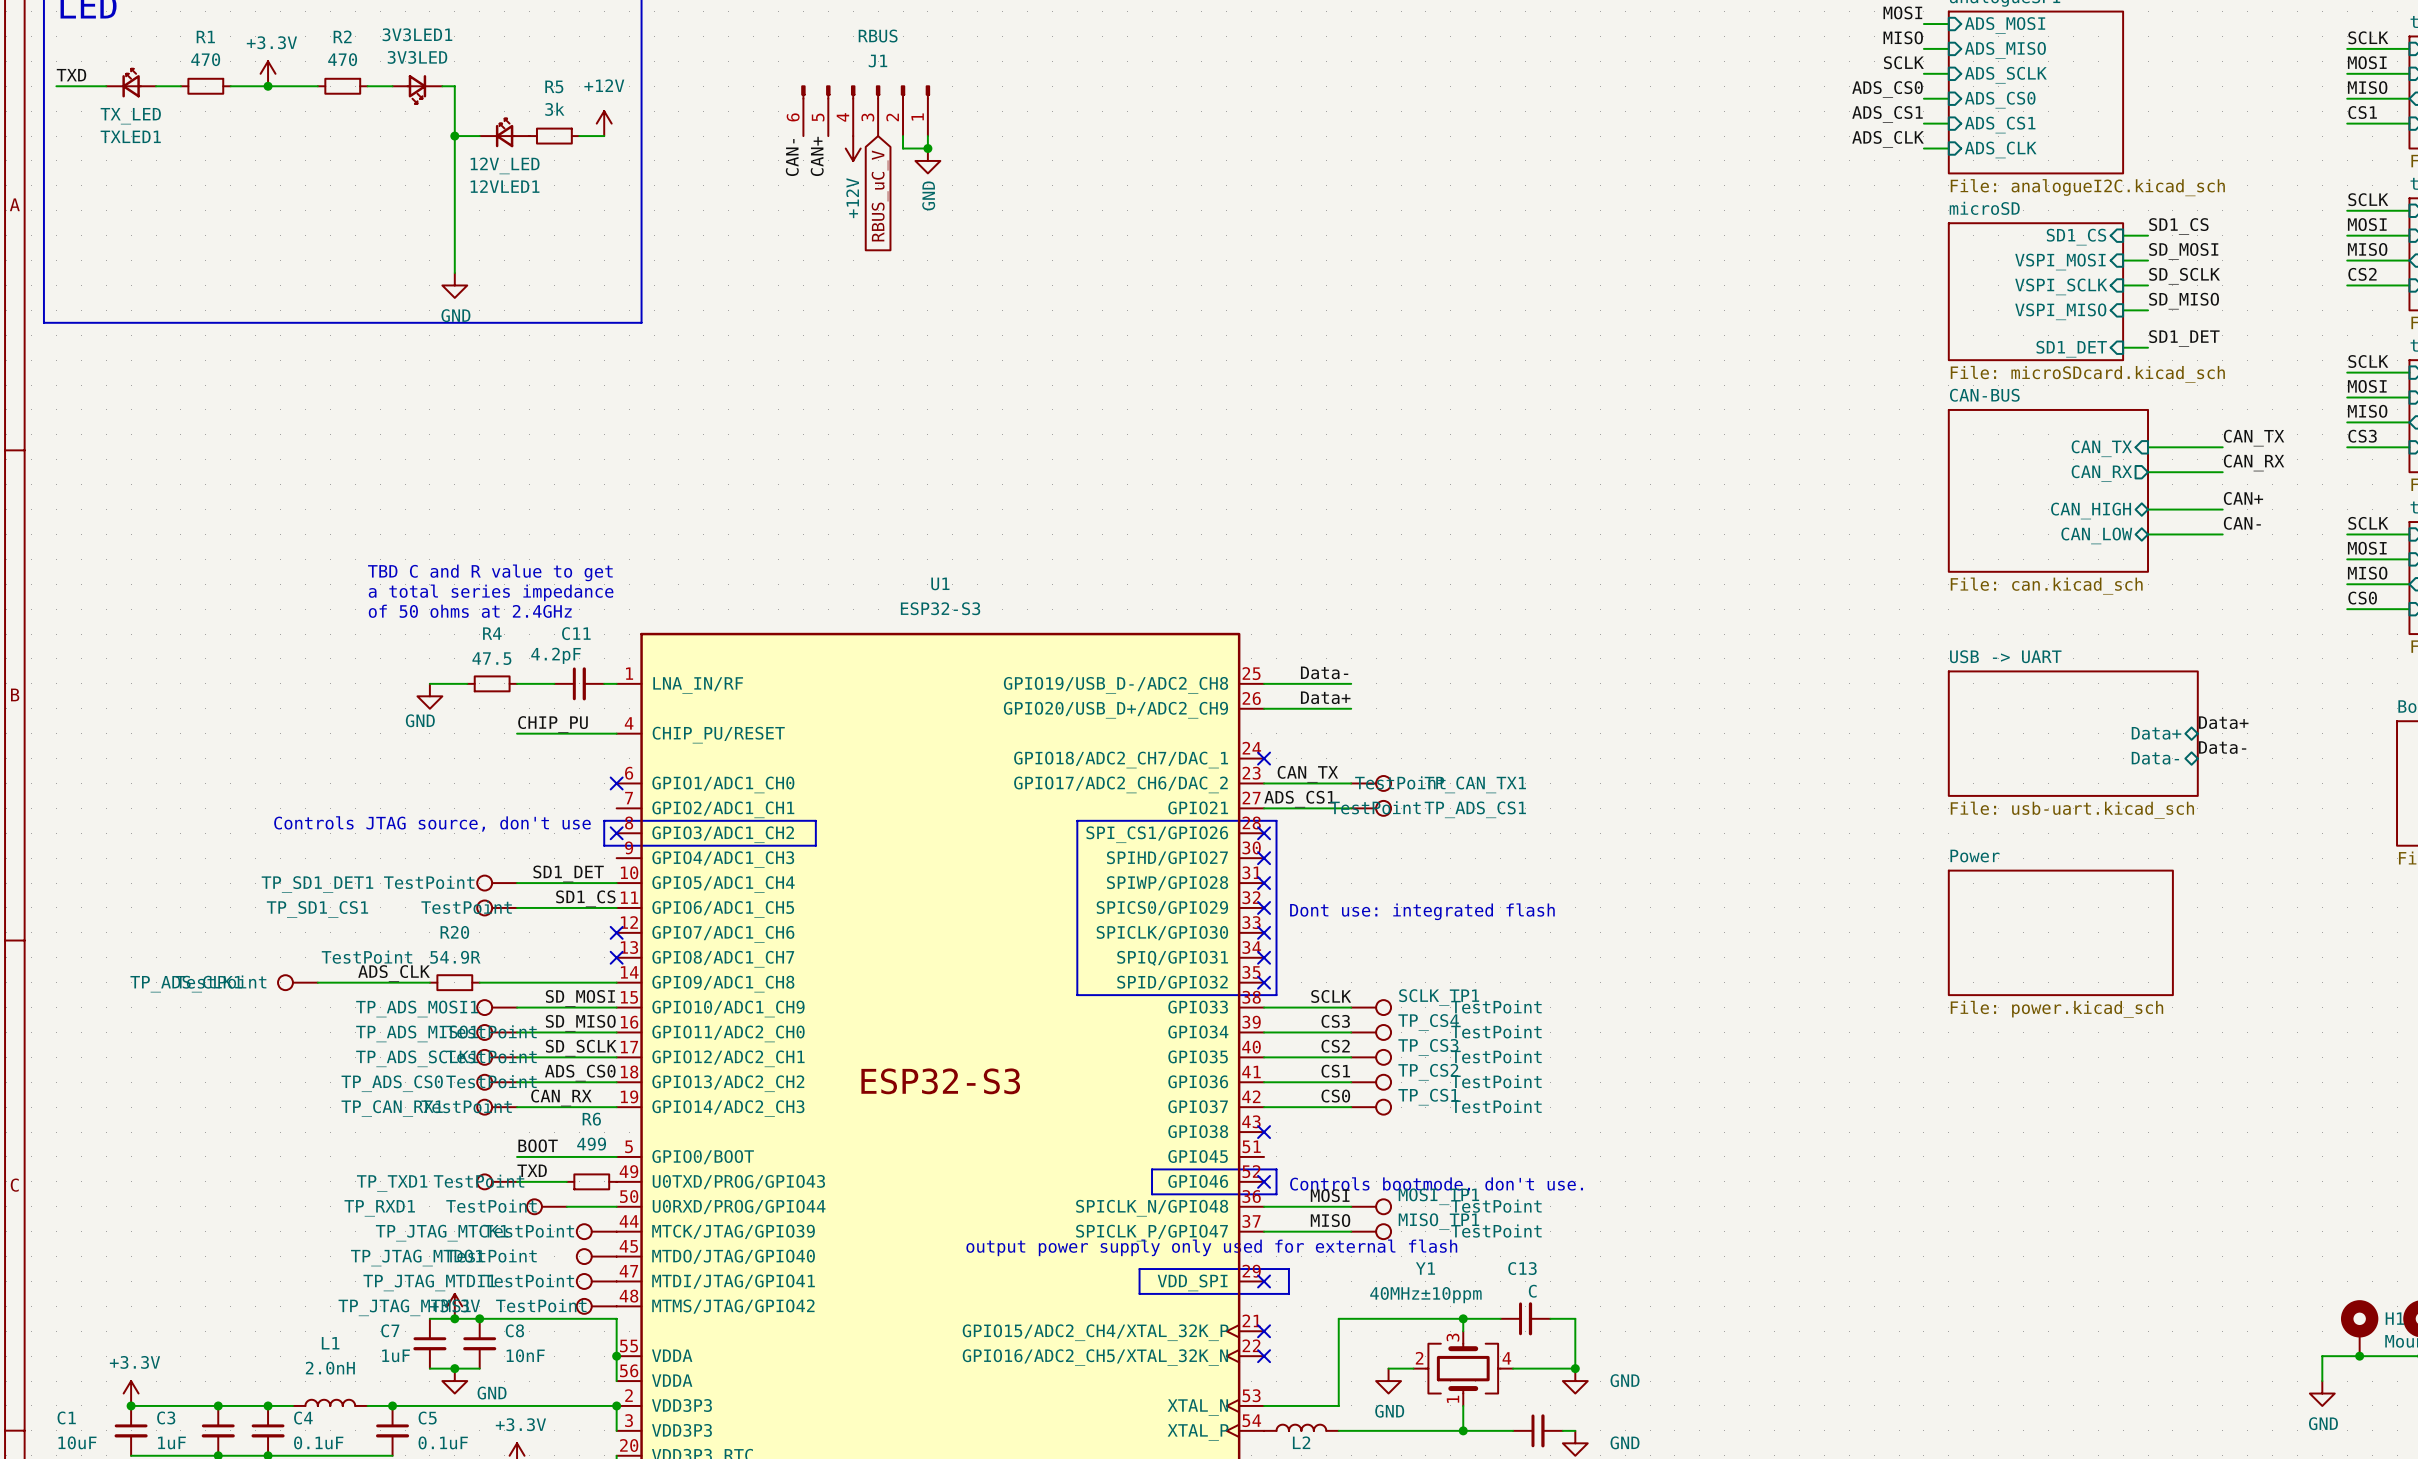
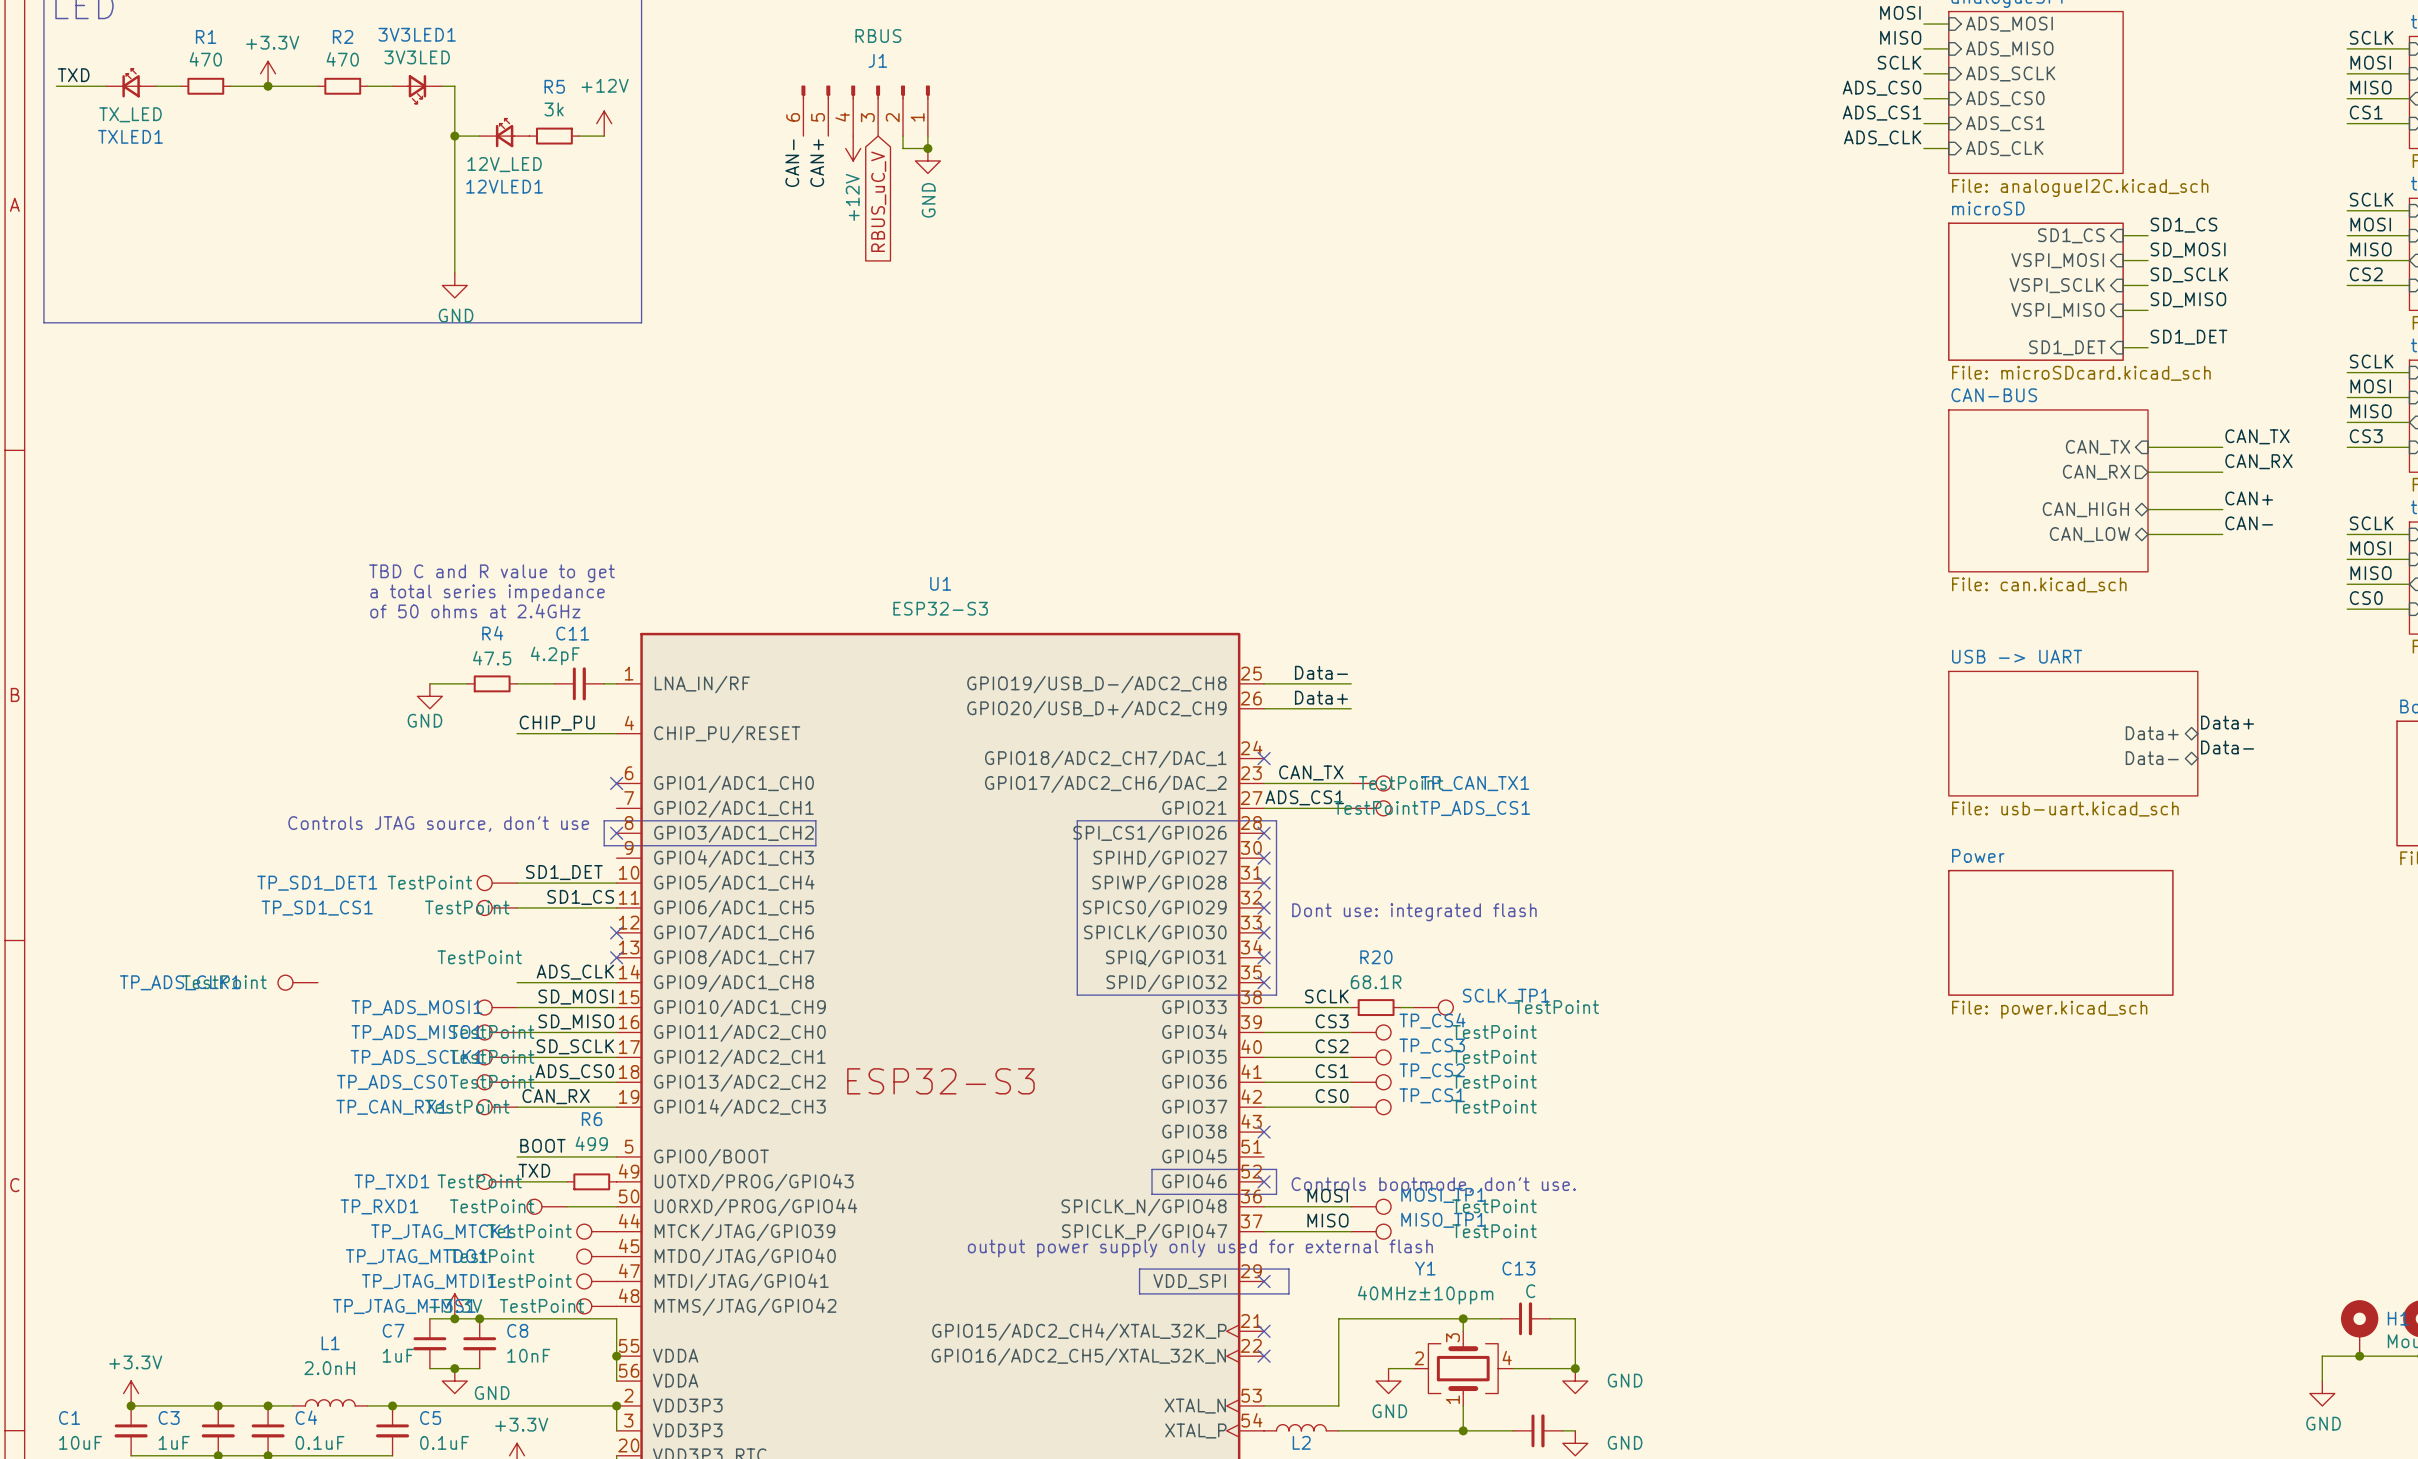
TP_ADS_MOSI1 value position: TestPoint (367, 957) -> TestPoint (479, 957)
R20 value: 54.9R (455, 957) -> 68.1R (1376, 982)
label position: ADS_CLK (394, 973) -> ADS_CLK (575, 972)
wire: (317, 982) (429, 982) -> none
R20 position: (454, 982) -> (1376, 1007)
wire: (479, 982) (517, 982) -> none
SCLK_TP1 position: (1371, 1007) -> (1433, 1007)
wire: none -> (1401, 1007) (1413, 1007)

